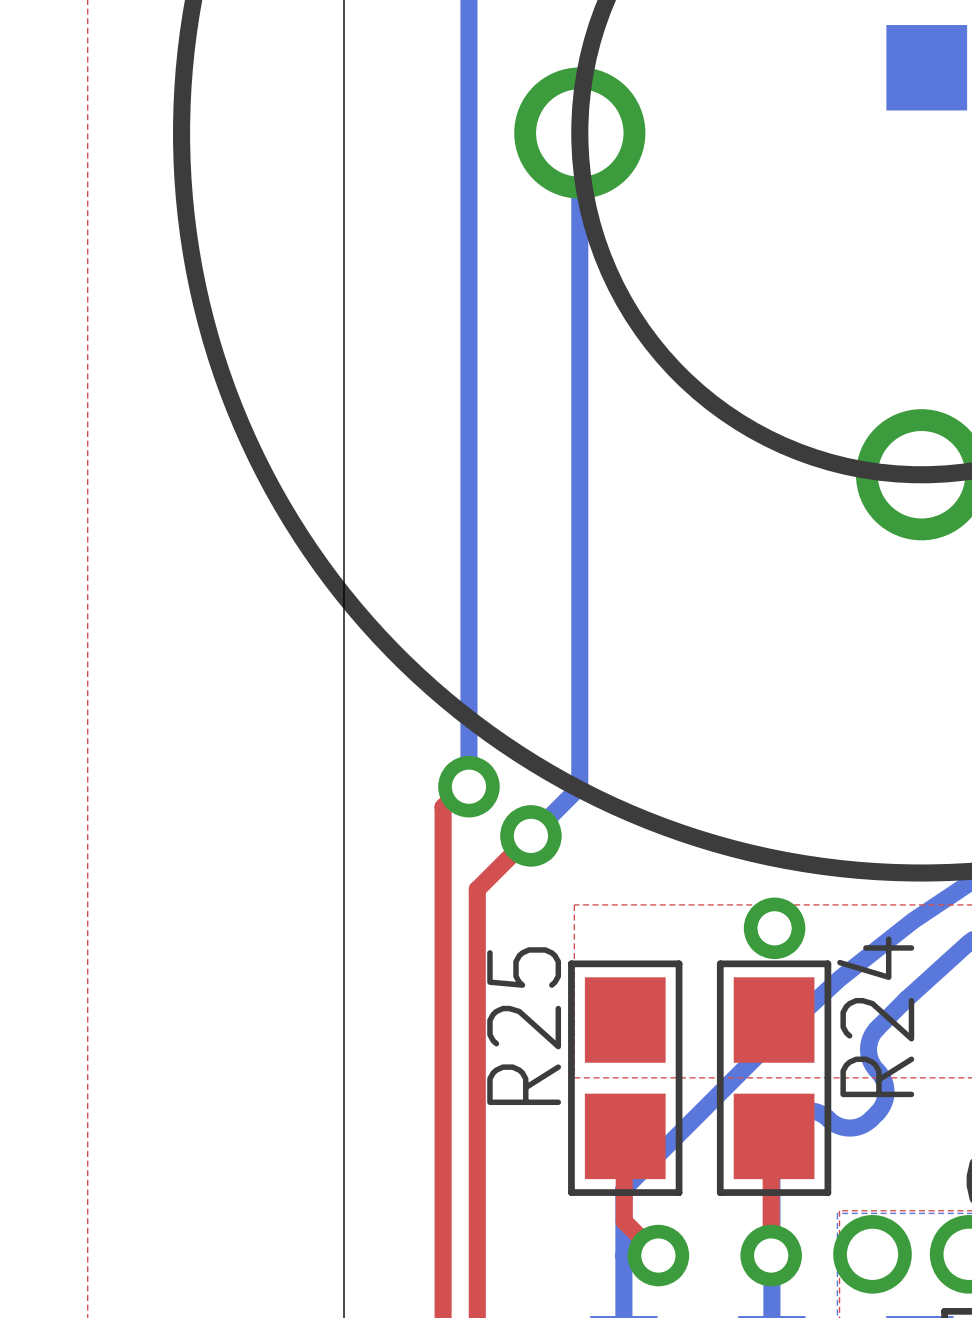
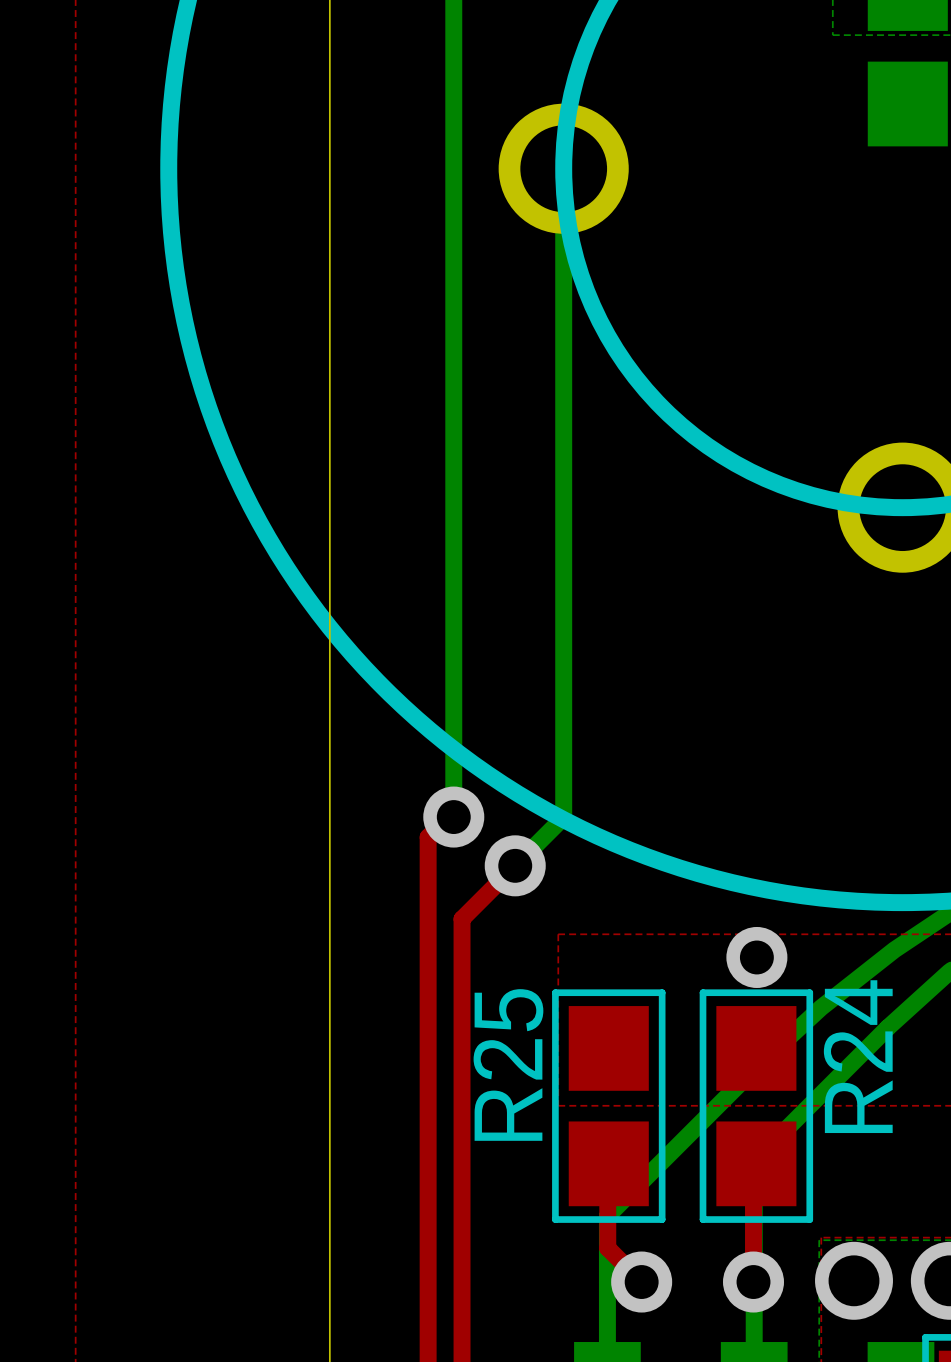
bottom track: (877, 1028) (870, 1038) (868, 1053) (872, 1064) (883, 1080) (885, 1095) (882, 1106) (870, 1119) (861, 1125) (849, 1128) (838, 1125) (822, 1114) (811, 1110) (796, 1112) (786, 1119) -> (858, 1056) (768, 1146)

